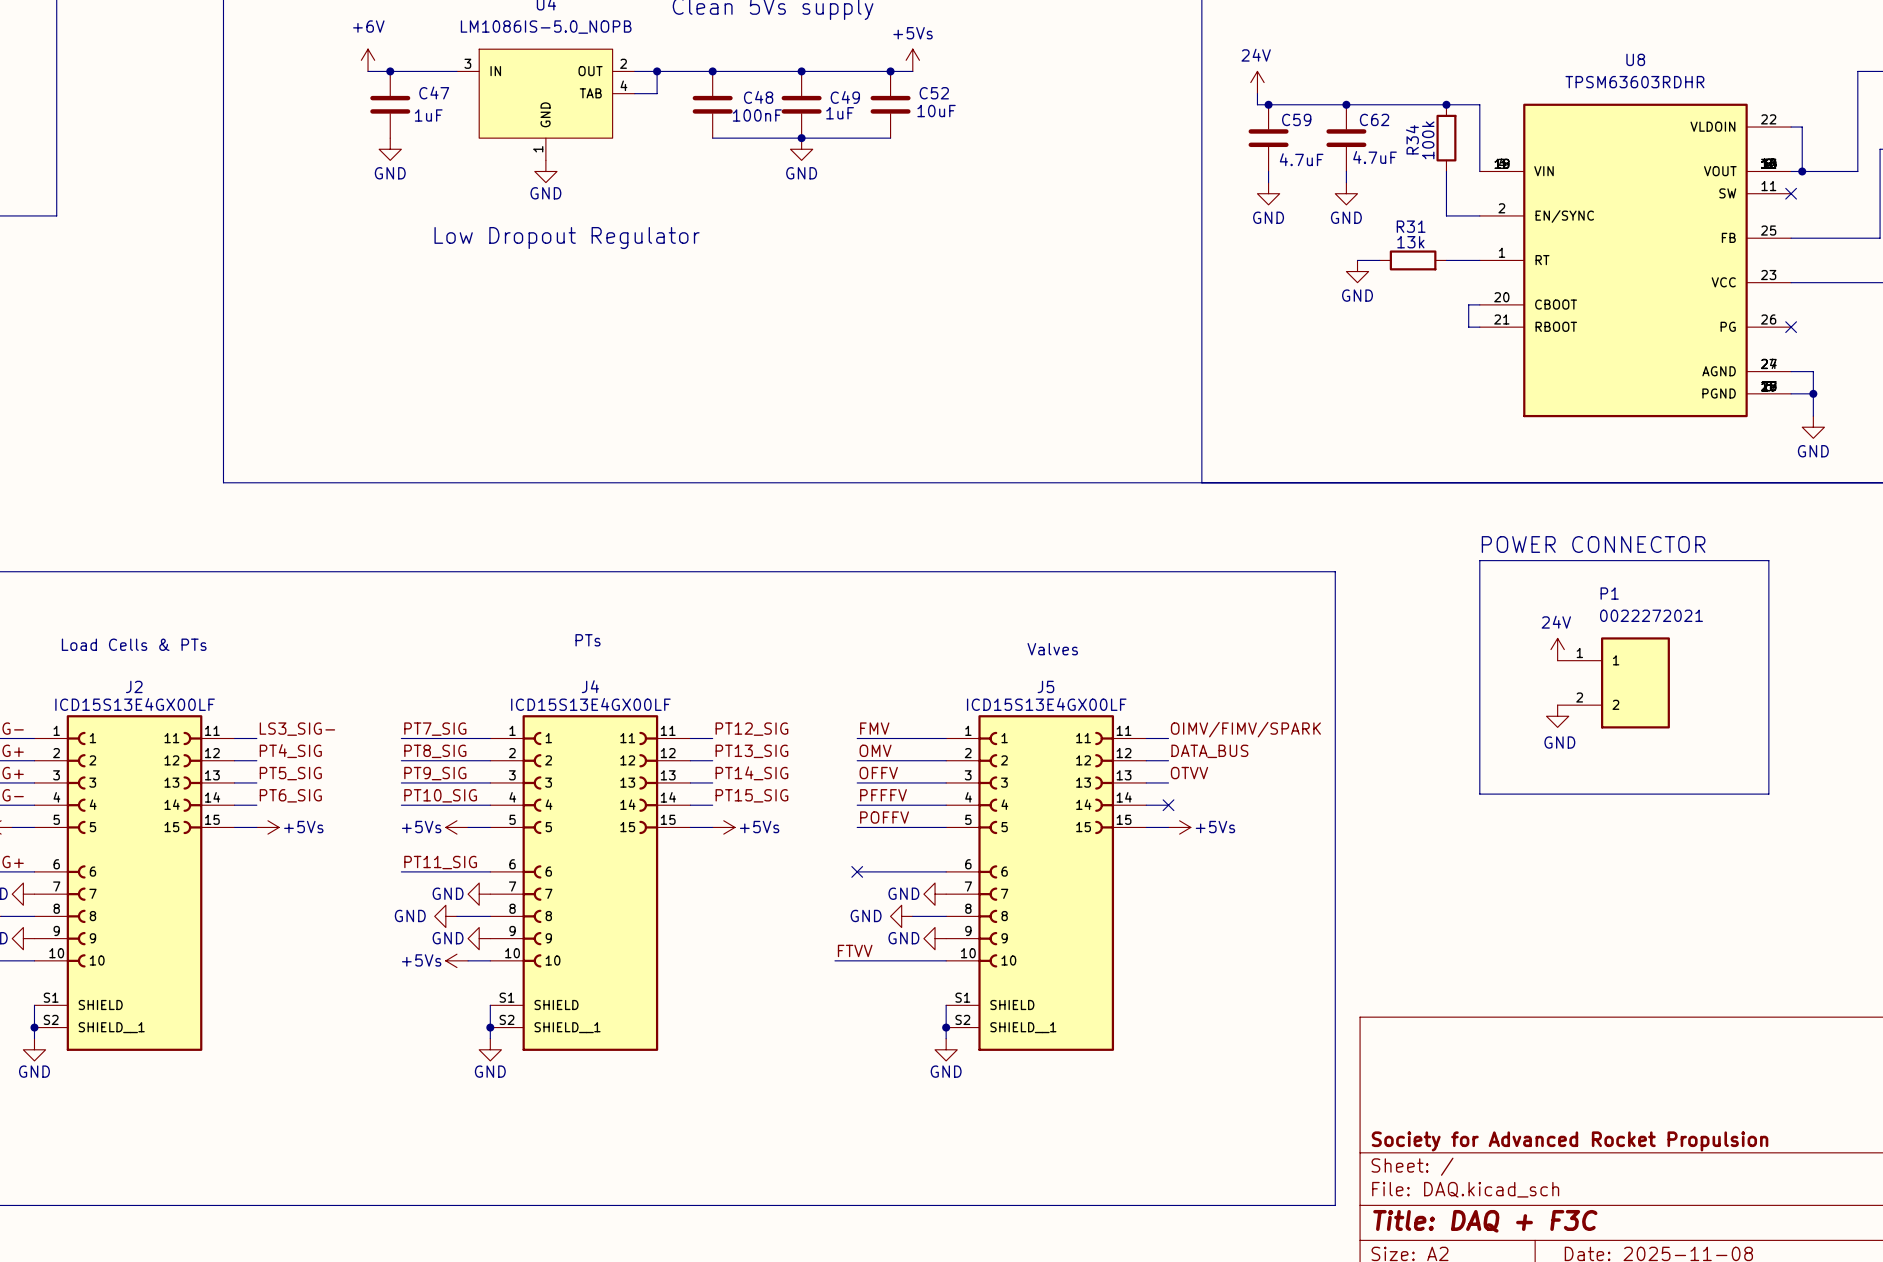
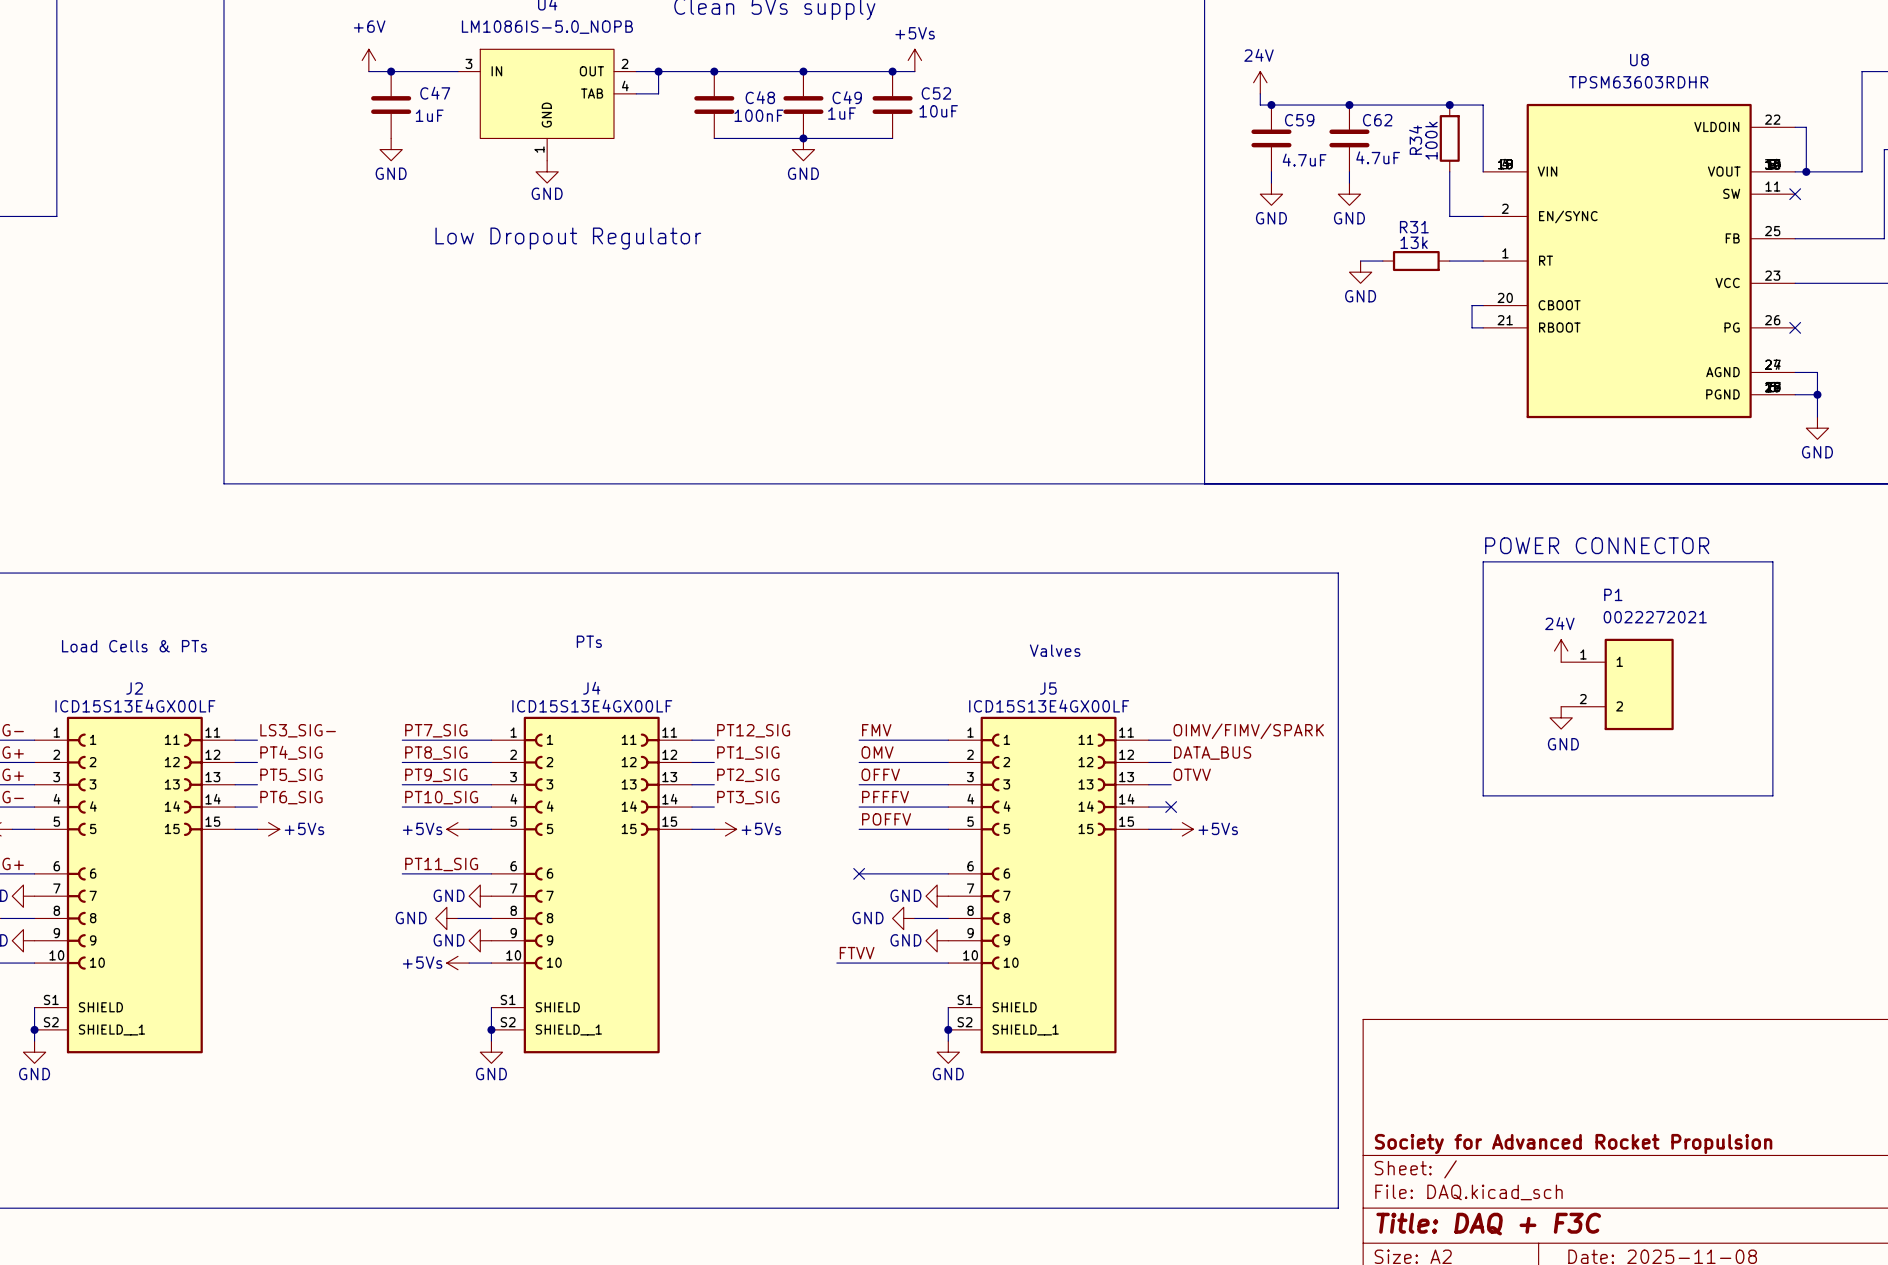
label: PT13_SIG (751, 751) -> PT1_SIG (748, 753)
label: PT14_SIG (751, 773) -> PT2_SIG (748, 775)
label: PT15_SIG (751, 795) -> PT3_SIG (748, 797)

